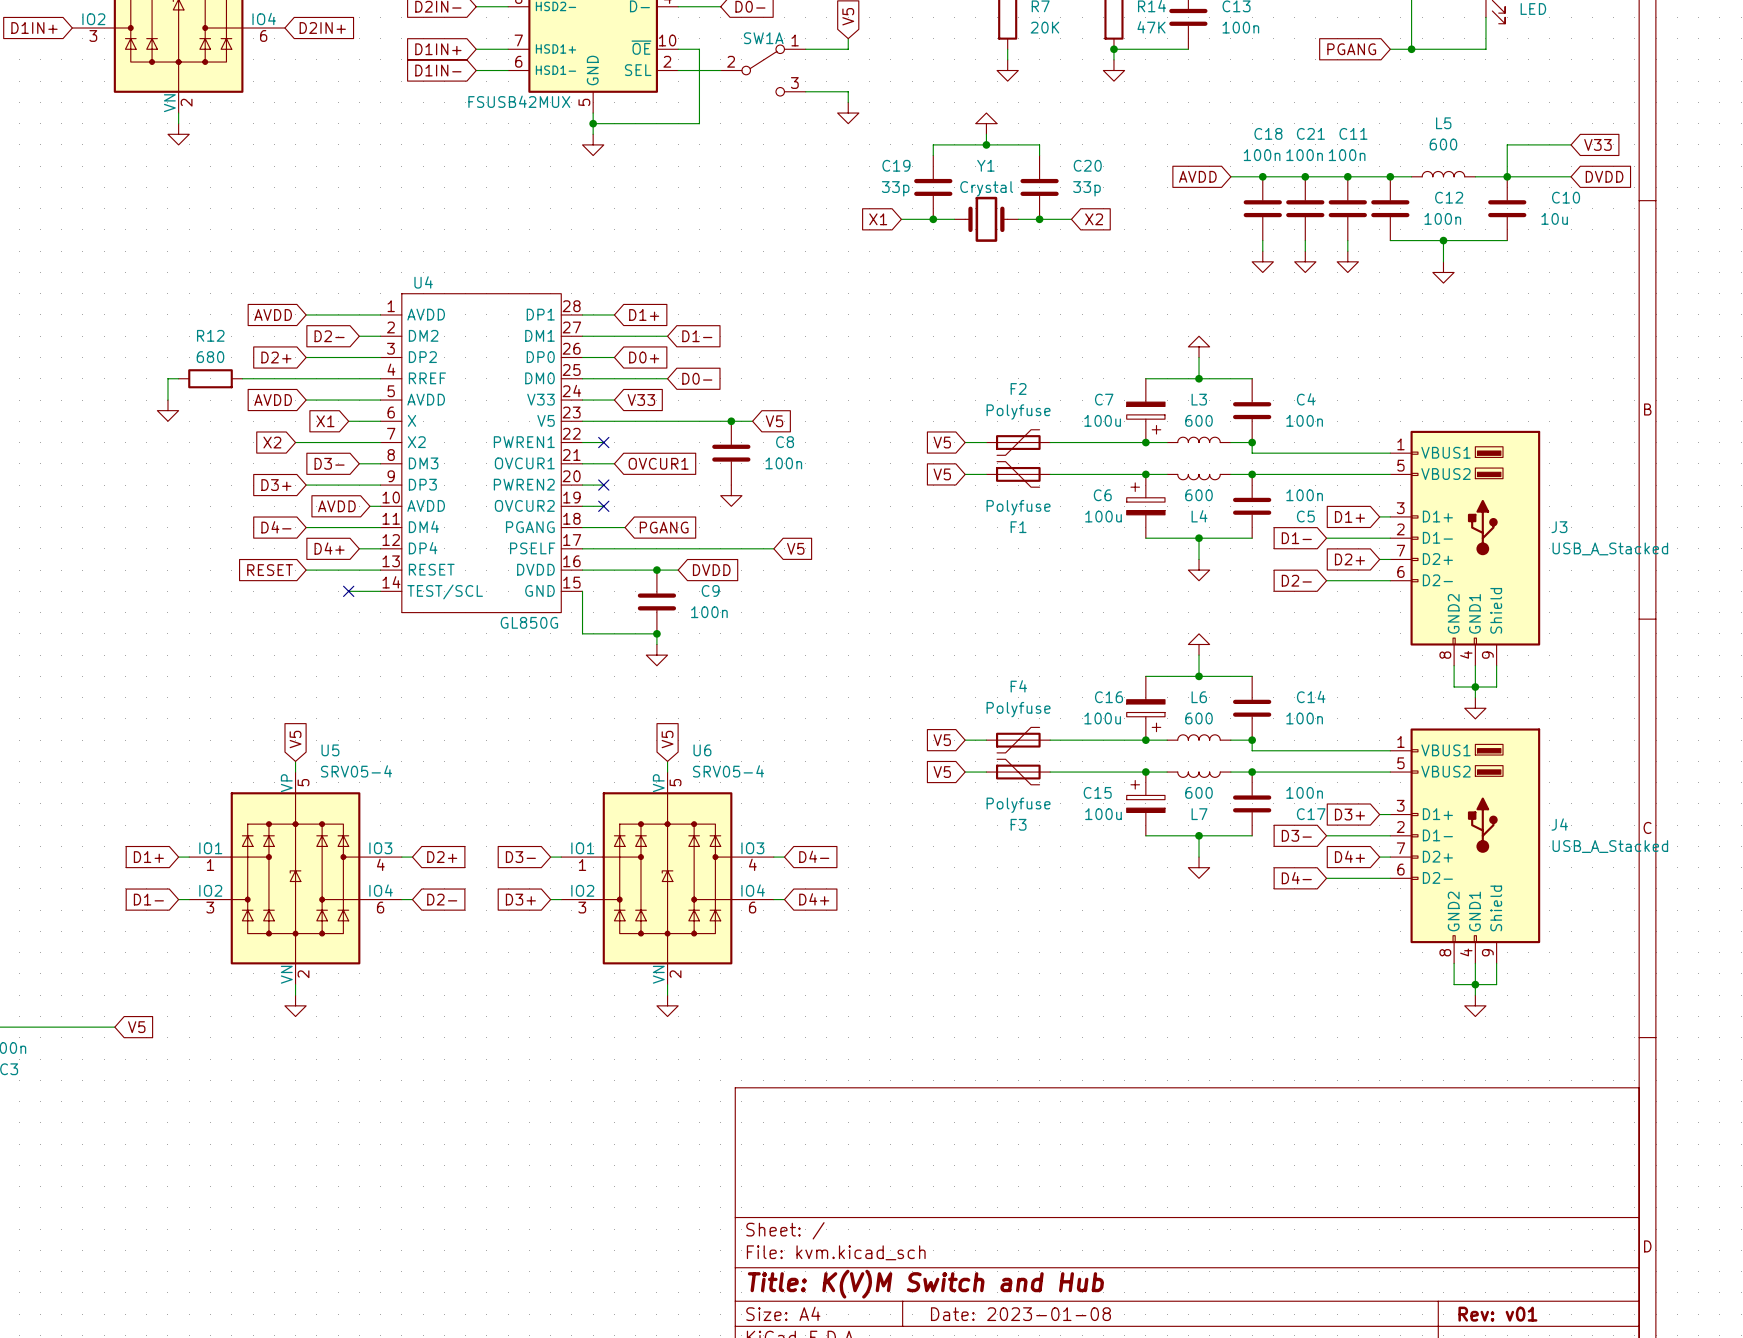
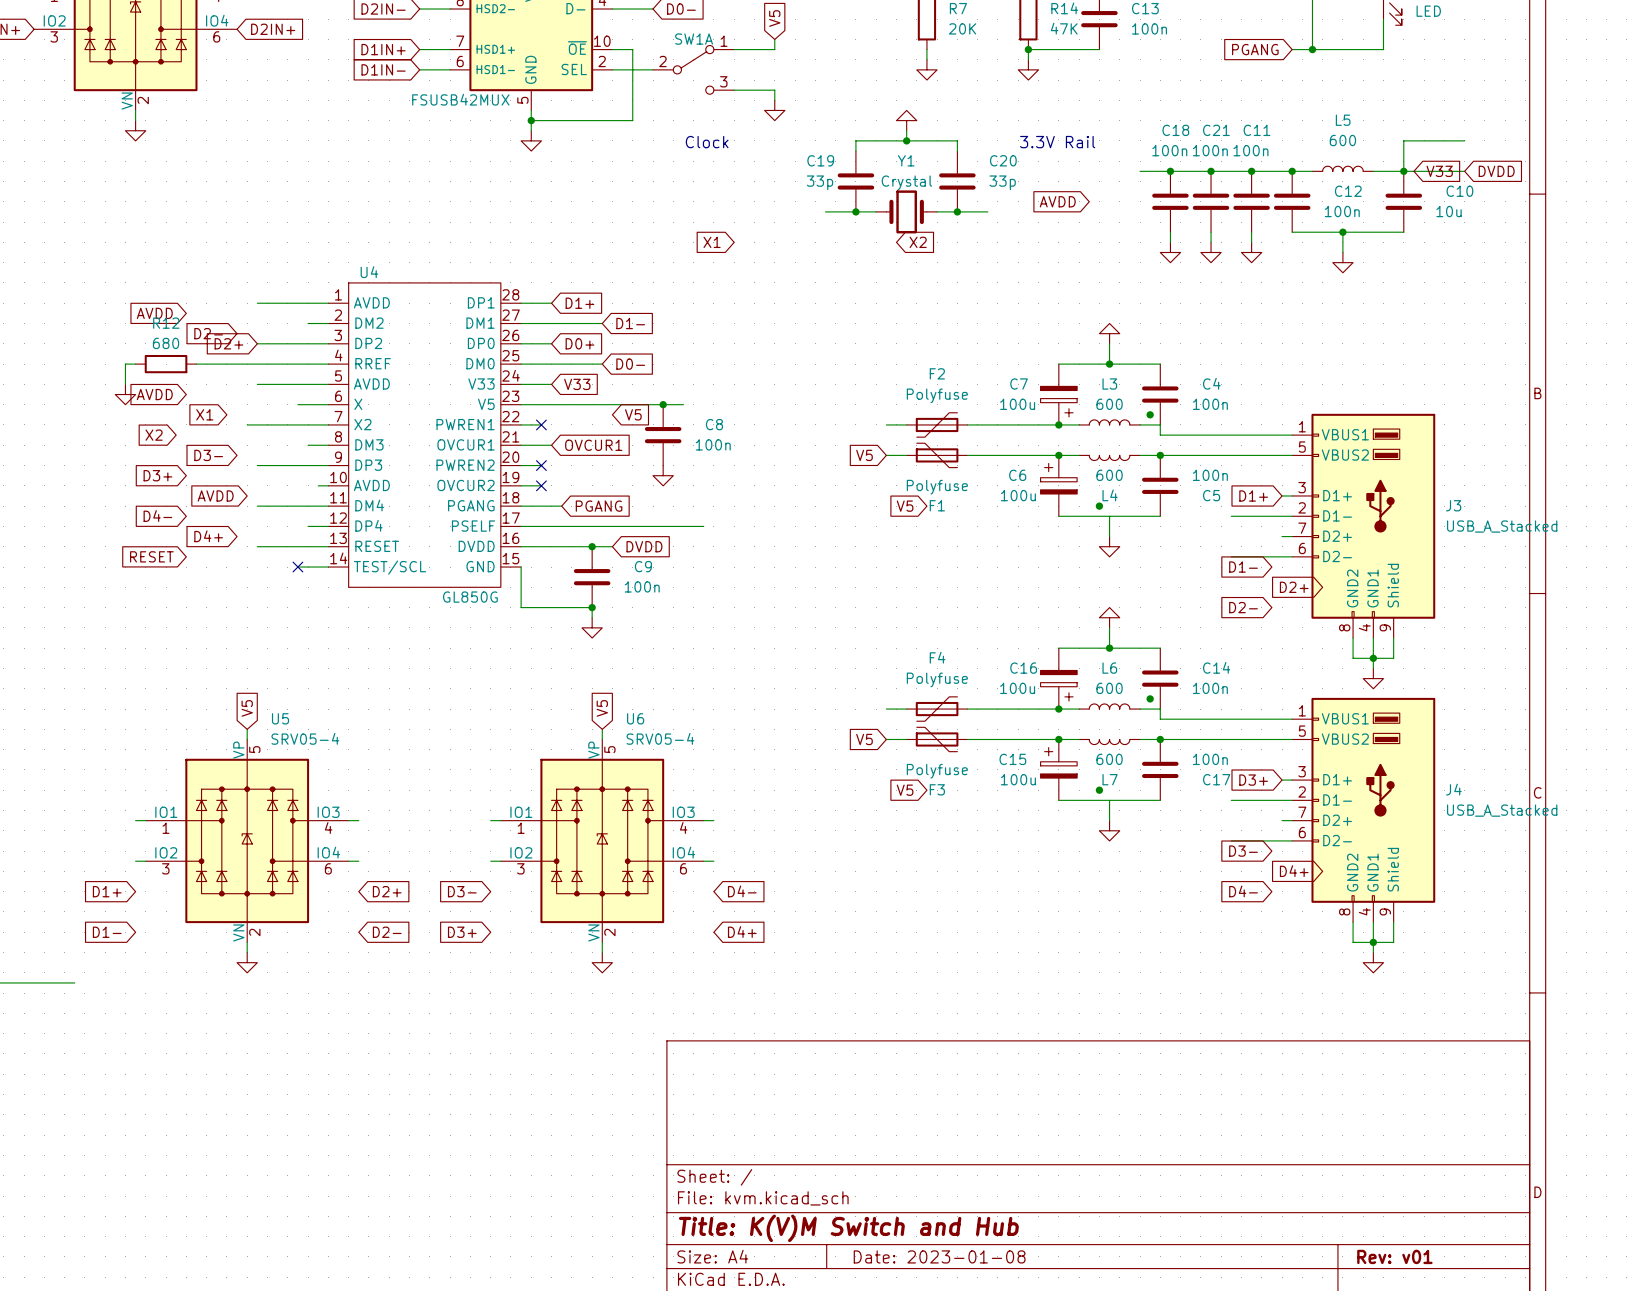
global label position: V33 (1597, 144) -> V33 (1439, 171)
text: none -> Clock (707, 142)
text: none -> 3.3V Rail (1057, 142)
global label position: AVDD (1197, 176) -> AVDD (1057, 201)
global label position: X1 (878, 219) -> X1 (712, 242)
global label position: X2 (1094, 219) -> X2 (918, 242)
global label: AVDD (273, 314) -> none
global label: none -> AVDD (154, 313)
global label position: D2- (329, 336) -> D2- (208, 333)
global label: AVDD (273, 400) -> none
global label: none -> AVDD (154, 394)
global label position: X1 (325, 421) -> X1 (204, 414)
global label position: V5 (774, 421) -> V5 (633, 414)
global label position: X2 (272, 442) -> X2 (154, 435)
global label position: V5 (942, 442) -> V5 (905, 506)
junction position: (1252, 442) -> (1150, 414)
global label position: D3- (329, 463) -> D3- (208, 455)
global label position: D3+ (276, 485) -> D3+ (157, 475)
global label: AVDD (336, 506) -> none
global label: none -> AVDD (215, 495)
global label position: D4- (276, 527) -> D4- (157, 516)
junction position: (1199, 538) -> (1099, 506)
global label position: D1- (1296, 538) -> D1- (1243, 567)
global label position: D4+ (329, 548) -> D4+ (208, 536)
global label: V5 (795, 548) -> none
global label position: D2+ (1349, 559) -> D2+ (1294, 587)
global label position: RESET (270, 570) -> RESET (151, 556)
global label position: D2- (1296, 580) -> D2- (1243, 607)
global label position: V5 (942, 740) -> V5 (905, 790)
junction position: (1252, 740) -> (1150, 698)
junction position: (1199, 835) -> (1099, 790)
global label position: D3- (1296, 835) -> D3- (1243, 851)
global label position: D4- (814, 856) -> D4- (742, 891)
global label position: D4+ (1349, 856) -> D4+ (1294, 871)
global label position: D1+ (148, 857) -> D1+ (107, 891)
global label position: D2+ (442, 857) -> D2+ (387, 891)
global label position: D3- (520, 857) -> D3- (462, 891)
global label position: D4- (1296, 878) -> D4- (1243, 891)
global label position: D1- (148, 899) -> D1- (107, 932)
global label position: D2- (442, 899) -> D2- (387, 932)
global label position: D3+ (520, 899) -> D3+ (462, 932)
global label position: D4+ (814, 899) -> D4+ (742, 932)
global label: V5 (136, 1027) -> none

